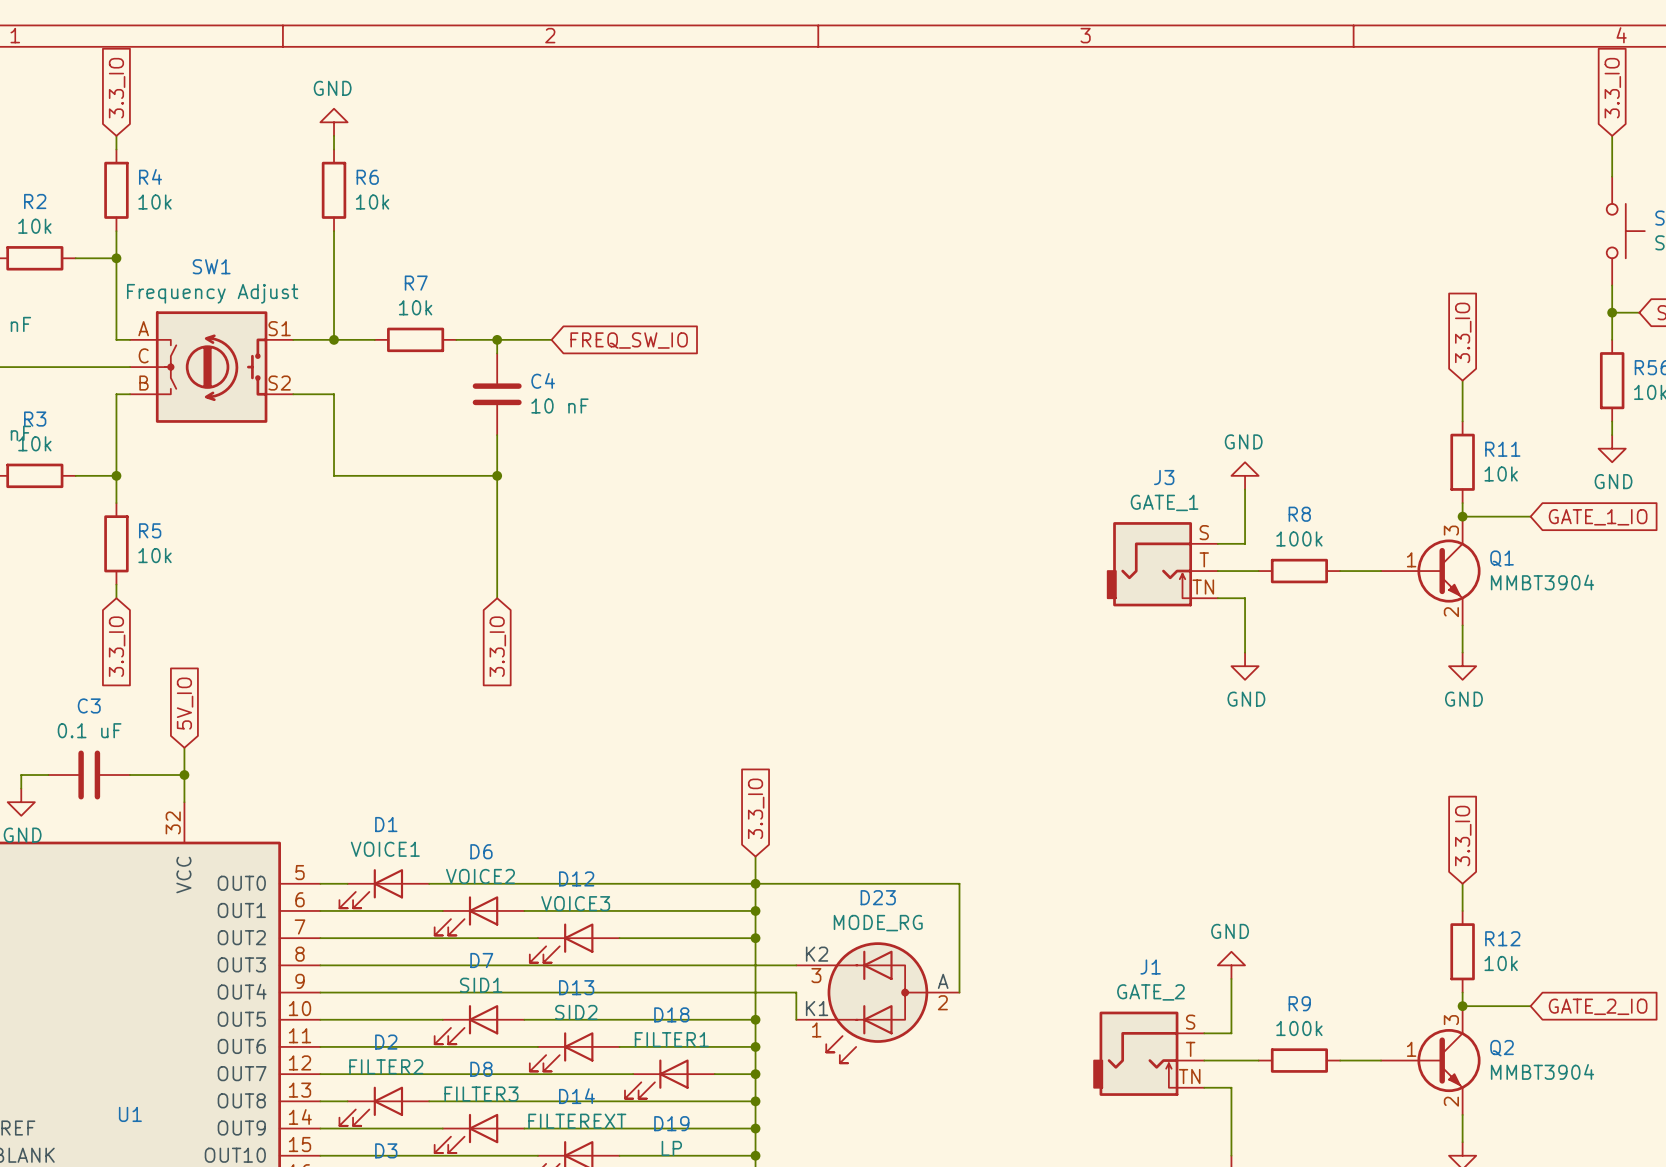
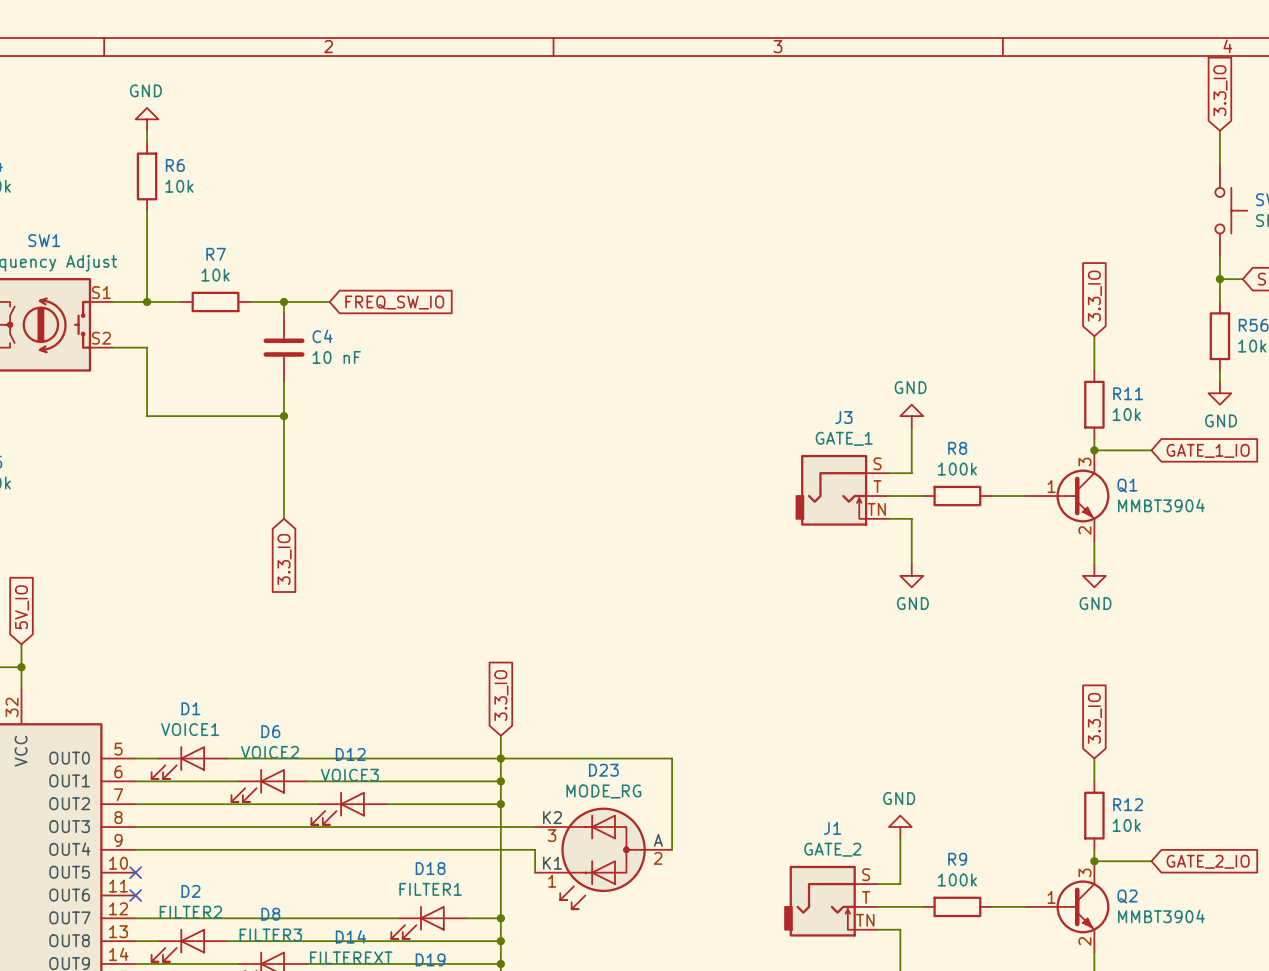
wire: (320, 1019) (442, 1019) -> none
no-connect mark: none -> (135, 872)
wire: (524, 1019) (755, 1019) -> none
junction: (755, 1019) -> none
D7: SID1 (479, 1024) -> none
wire: (320, 1046) (537, 1046) -> none
no-connect mark: none -> (135, 895)
wire: (619, 1046) (755, 1046) -> none
junction: (755, 1046) -> none
D13: SID2 (574, 1051) -> none

